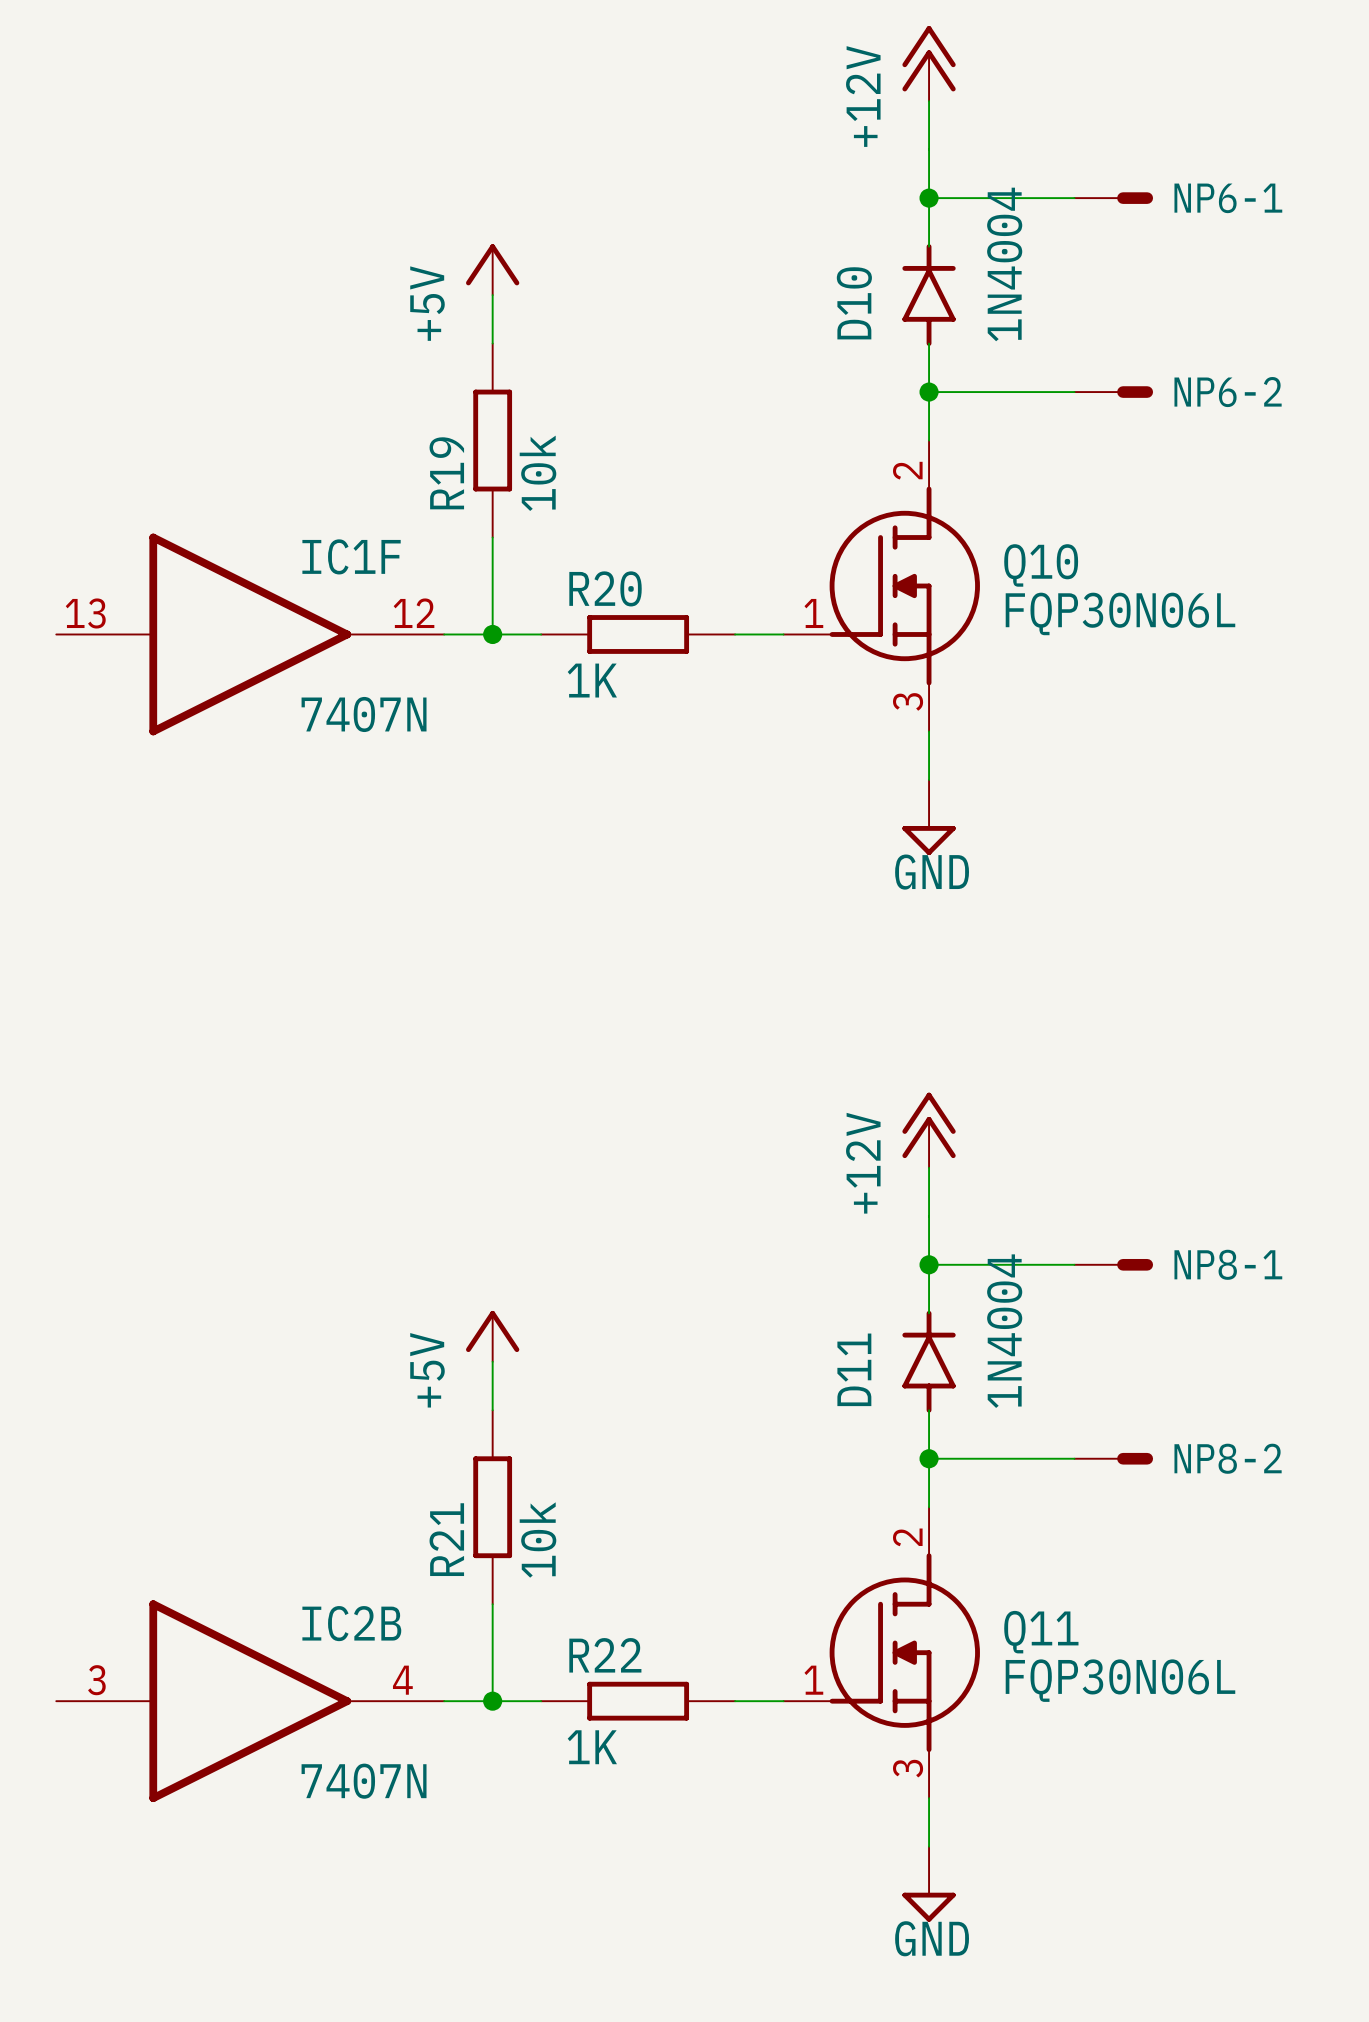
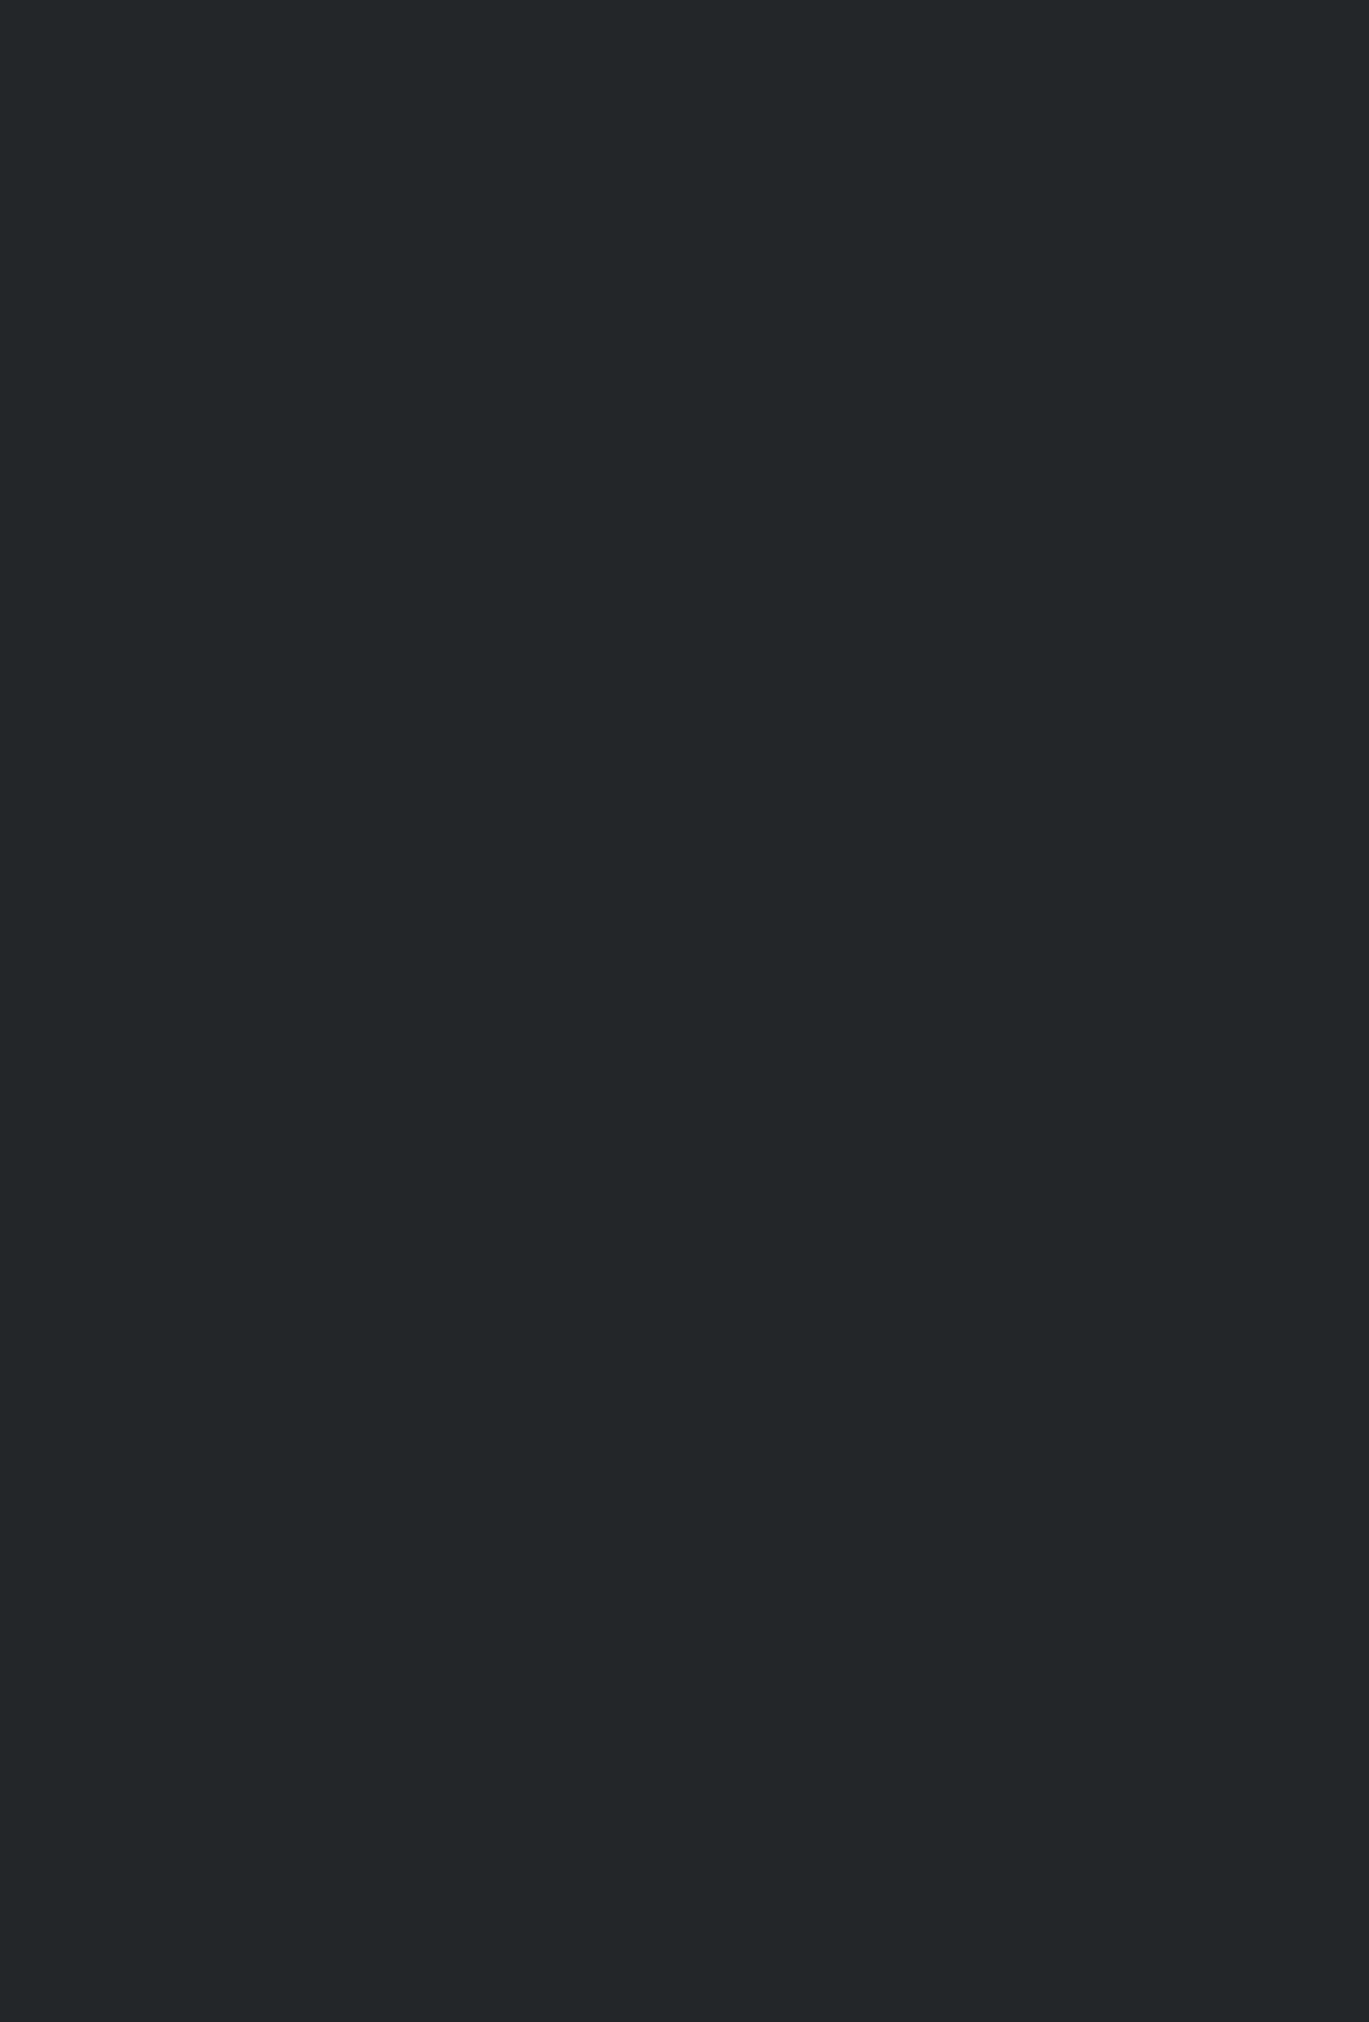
power symbol: +12V (929, 63) -> none
wire: (929, 101) (929, 246) -> none
wire: (929, 198) (1074, 198) -> none
junction: (929, 198) -> none
NP6-1: (1113, 198) -> none
power symbol: +5V (492, 269) -> none
wire: (492, 295) (492, 343) -> none
D10: 1N4004 (929, 295) -> none
wire: (929, 343) (929, 440) -> none
wire: (929, 392) (1074, 392) -> none
junction: (929, 392) -> none
NP6-2: (1113, 392) -> none
R19: 10k (492, 440) -> none
wire: (492, 537) (492, 634) -> none
Q10: FQP30N06L (881, 585) -> none
IC1F: 7407N (250, 634) -> none
wire: (444, 634) (541, 634) -> none
junction: (492, 634) -> none
R20: 1K (638, 634) -> none
wire: (735, 634) (783, 634) -> none
wire: (929, 731) (929, 779) -> none
power symbol: GND (929, 817) -> none
power symbol: +12V (929, 1130) -> none
wire: (929, 1167) (929, 1313) -> none
wire: (929, 1264) (1074, 1264) -> none
junction: (929, 1264) -> none
NP8-1: (1113, 1264) -> none
power symbol: +5V (492, 1336) -> none
wire: (492, 1361) (492, 1410) -> none
D11: 1N4004 (929, 1361) -> none
wire: (929, 1410) (929, 1507) -> none
wire: (929, 1458) (1074, 1458) -> none
junction: (929, 1458) -> none
NP8-2: (1113, 1458) -> none
R21: 10k (492, 1507) -> none
wire: (492, 1604) (492, 1701) -> none
Q11: FQP30N06L (881, 1652) -> none
IC2B: 7407N (250, 1701) -> none
wire: (444, 1701) (541, 1701) -> none
junction: (492, 1701) -> none
R22: 1K (638, 1701) -> none
wire: (735, 1701) (783, 1701) -> none
wire: (929, 1798) (929, 1846) -> none
power symbol: GND (929, 1884) -> none

